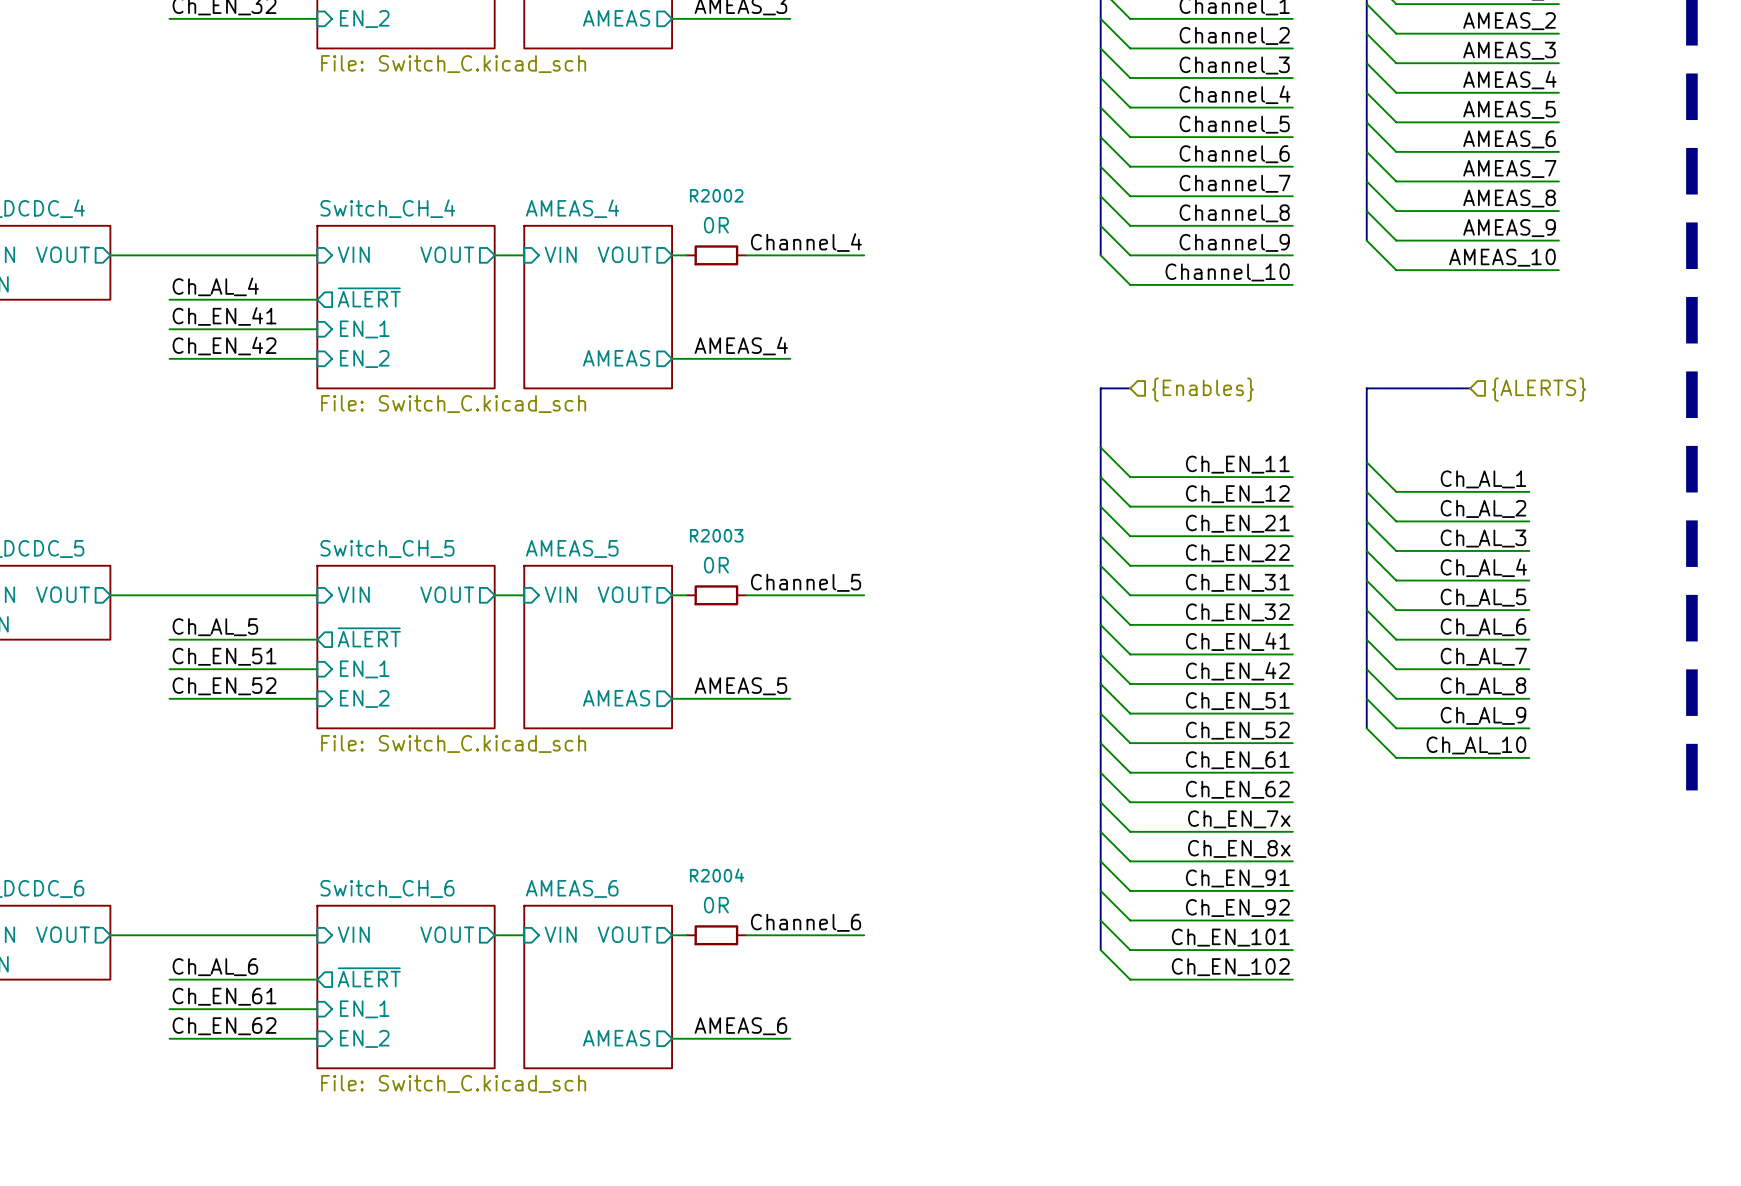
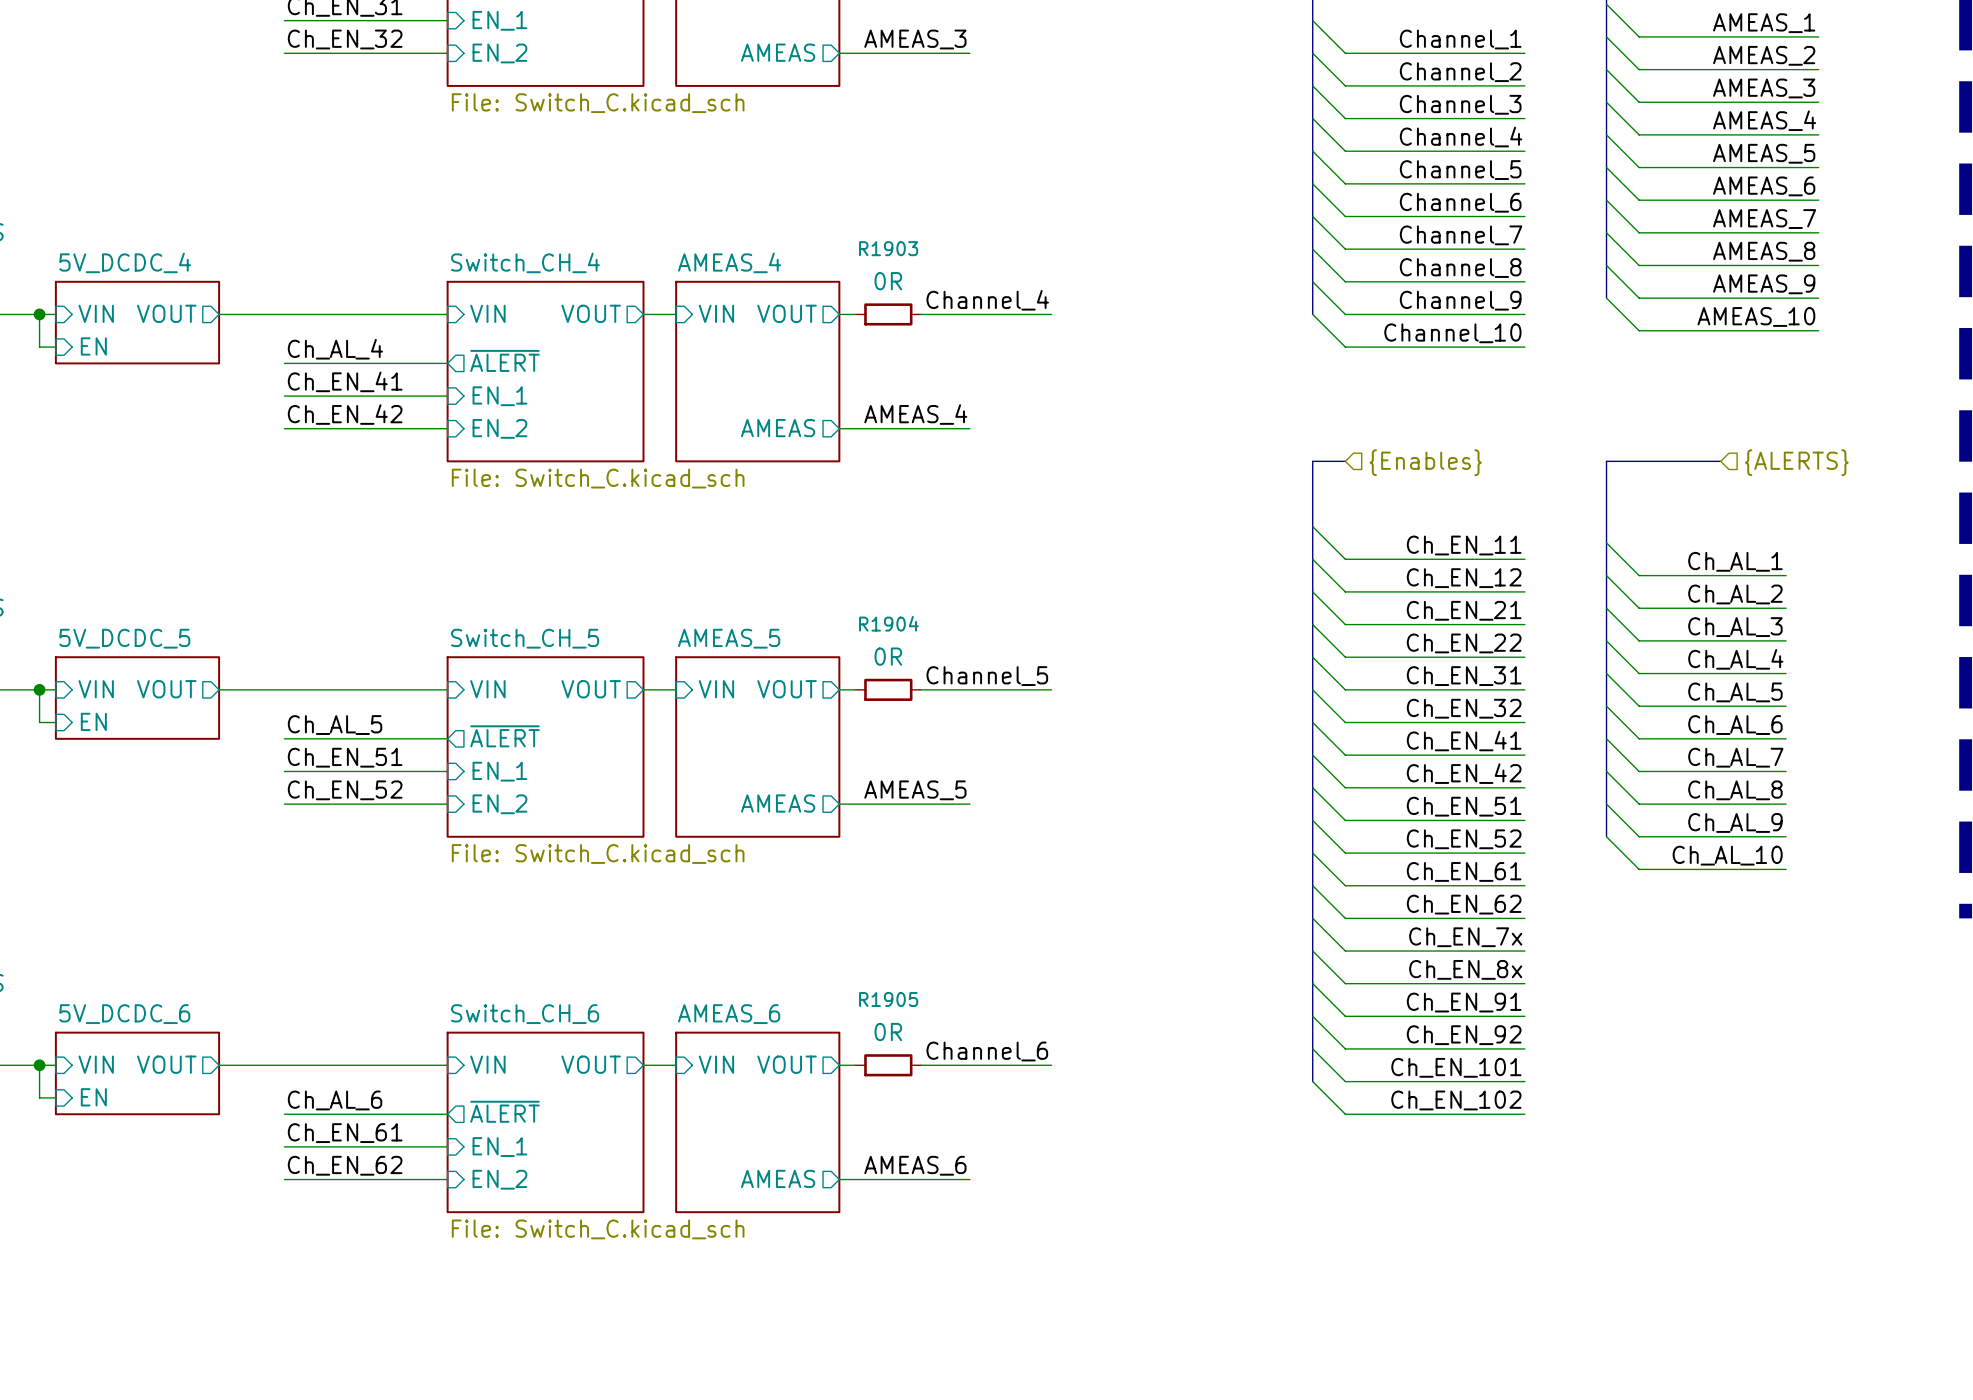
R2002 name: R2002 (716, 195) -> R1903 (888, 248)
R2003 name: R2003 (716, 535) -> R1904 (888, 623)
R2004 name: R2004 (716, 875) -> R1905 (888, 999)

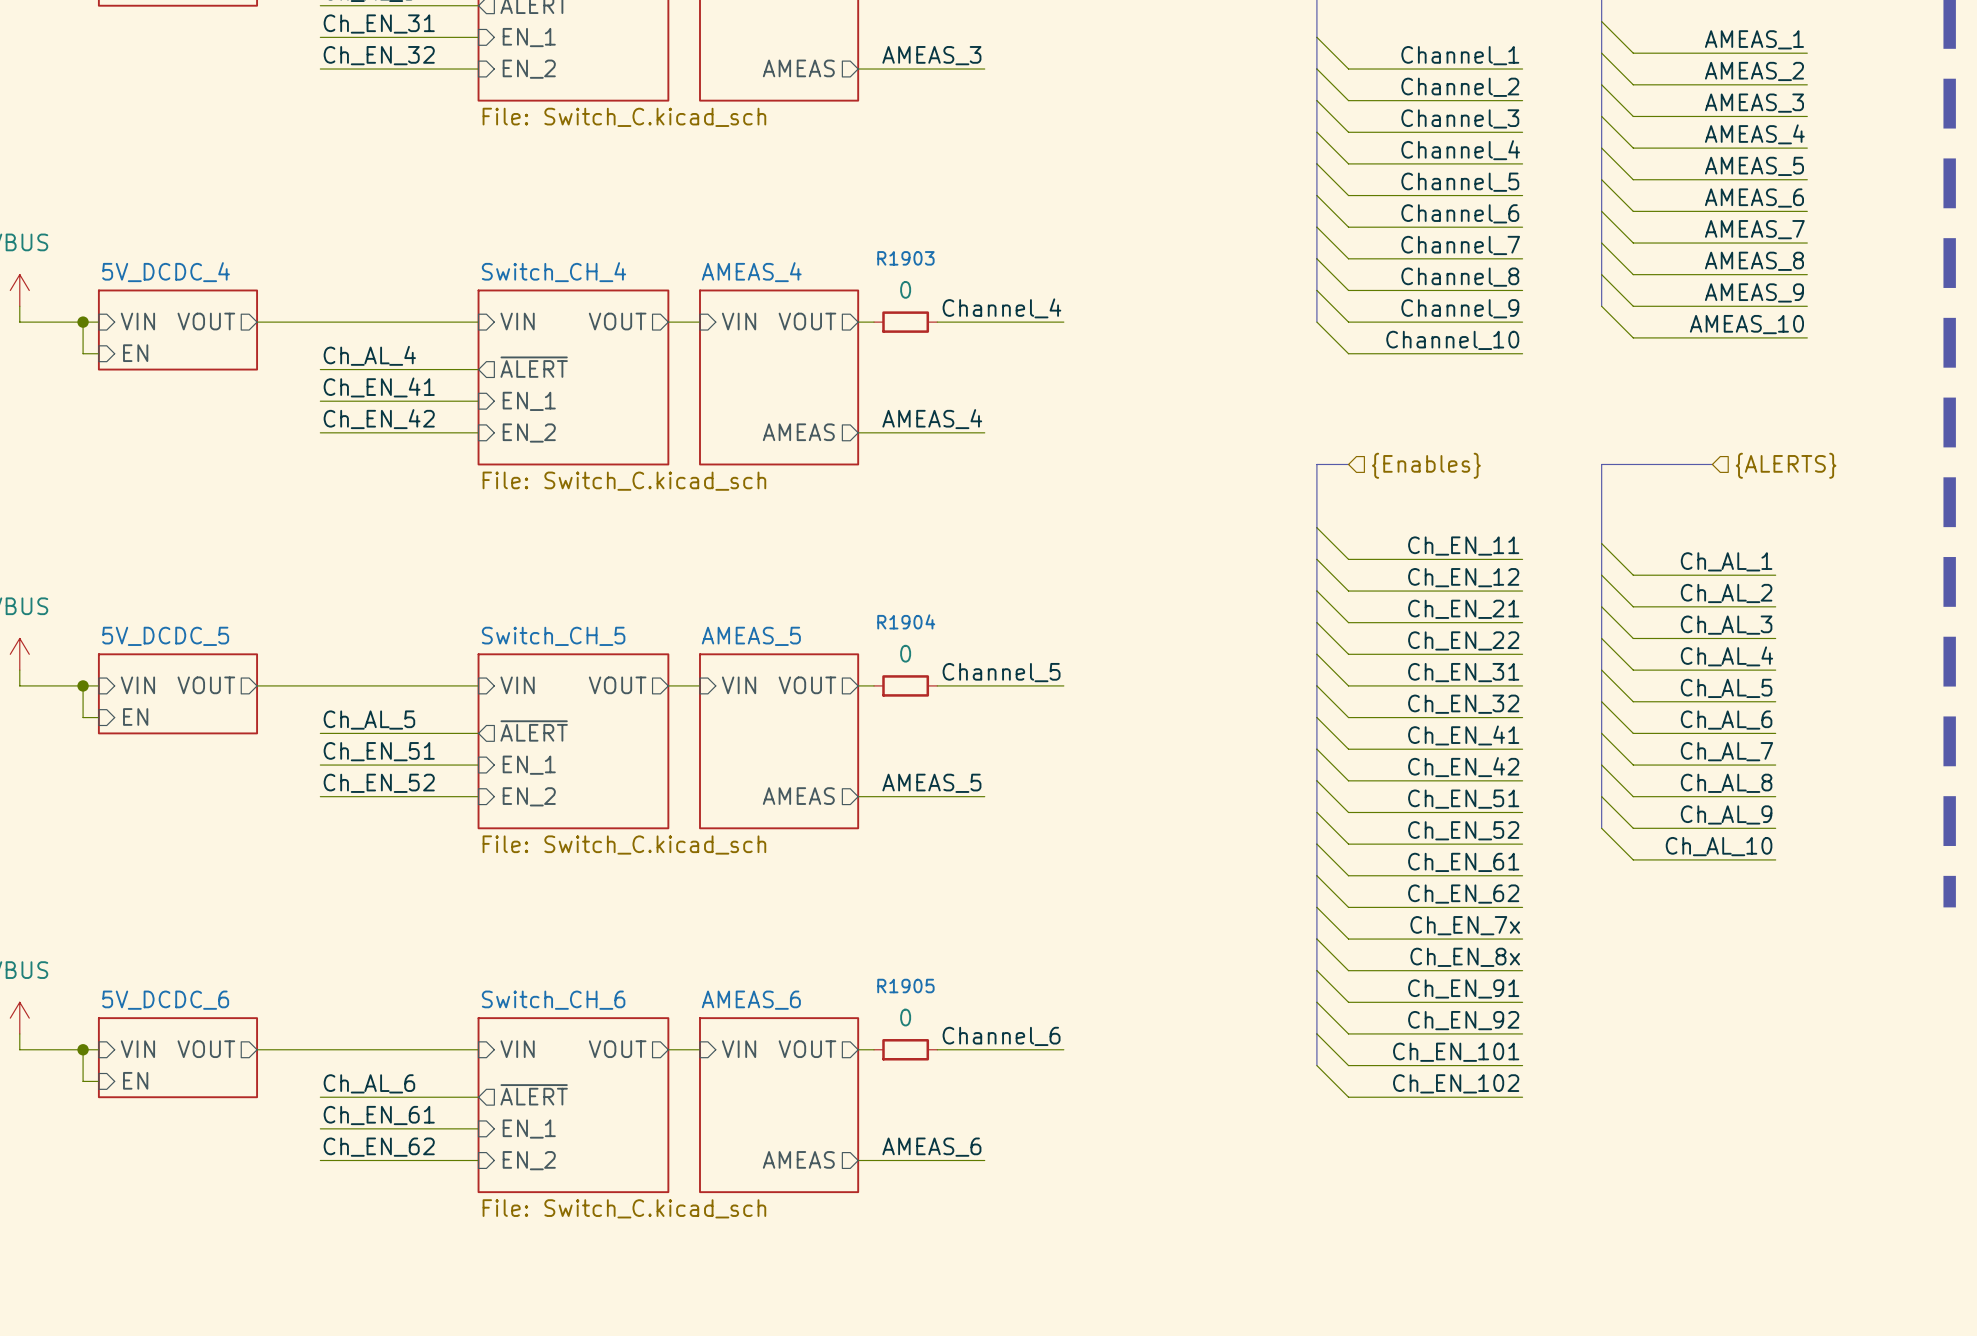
R1903 value: 0R (888, 281) -> 0 (905, 289)
R1904 value: 0R (888, 656) -> 0 (905, 653)
R1905 value: 0R (888, 1032) -> 0 (905, 1017)

